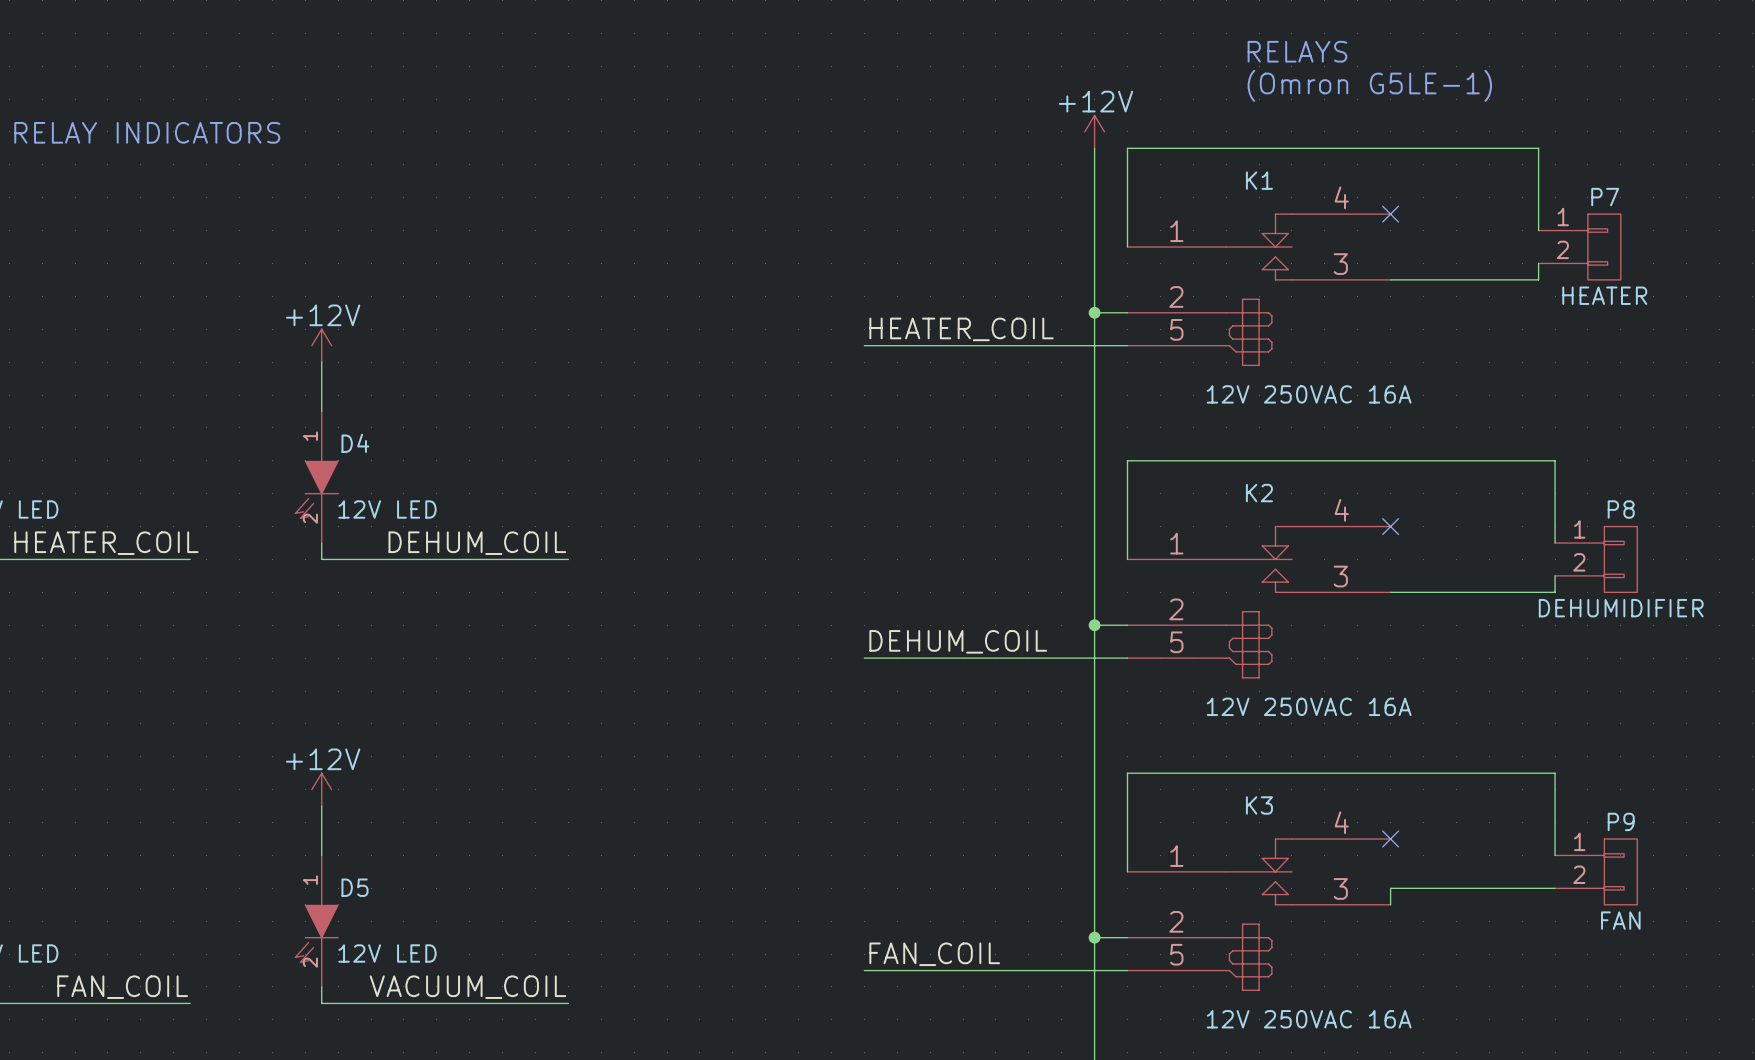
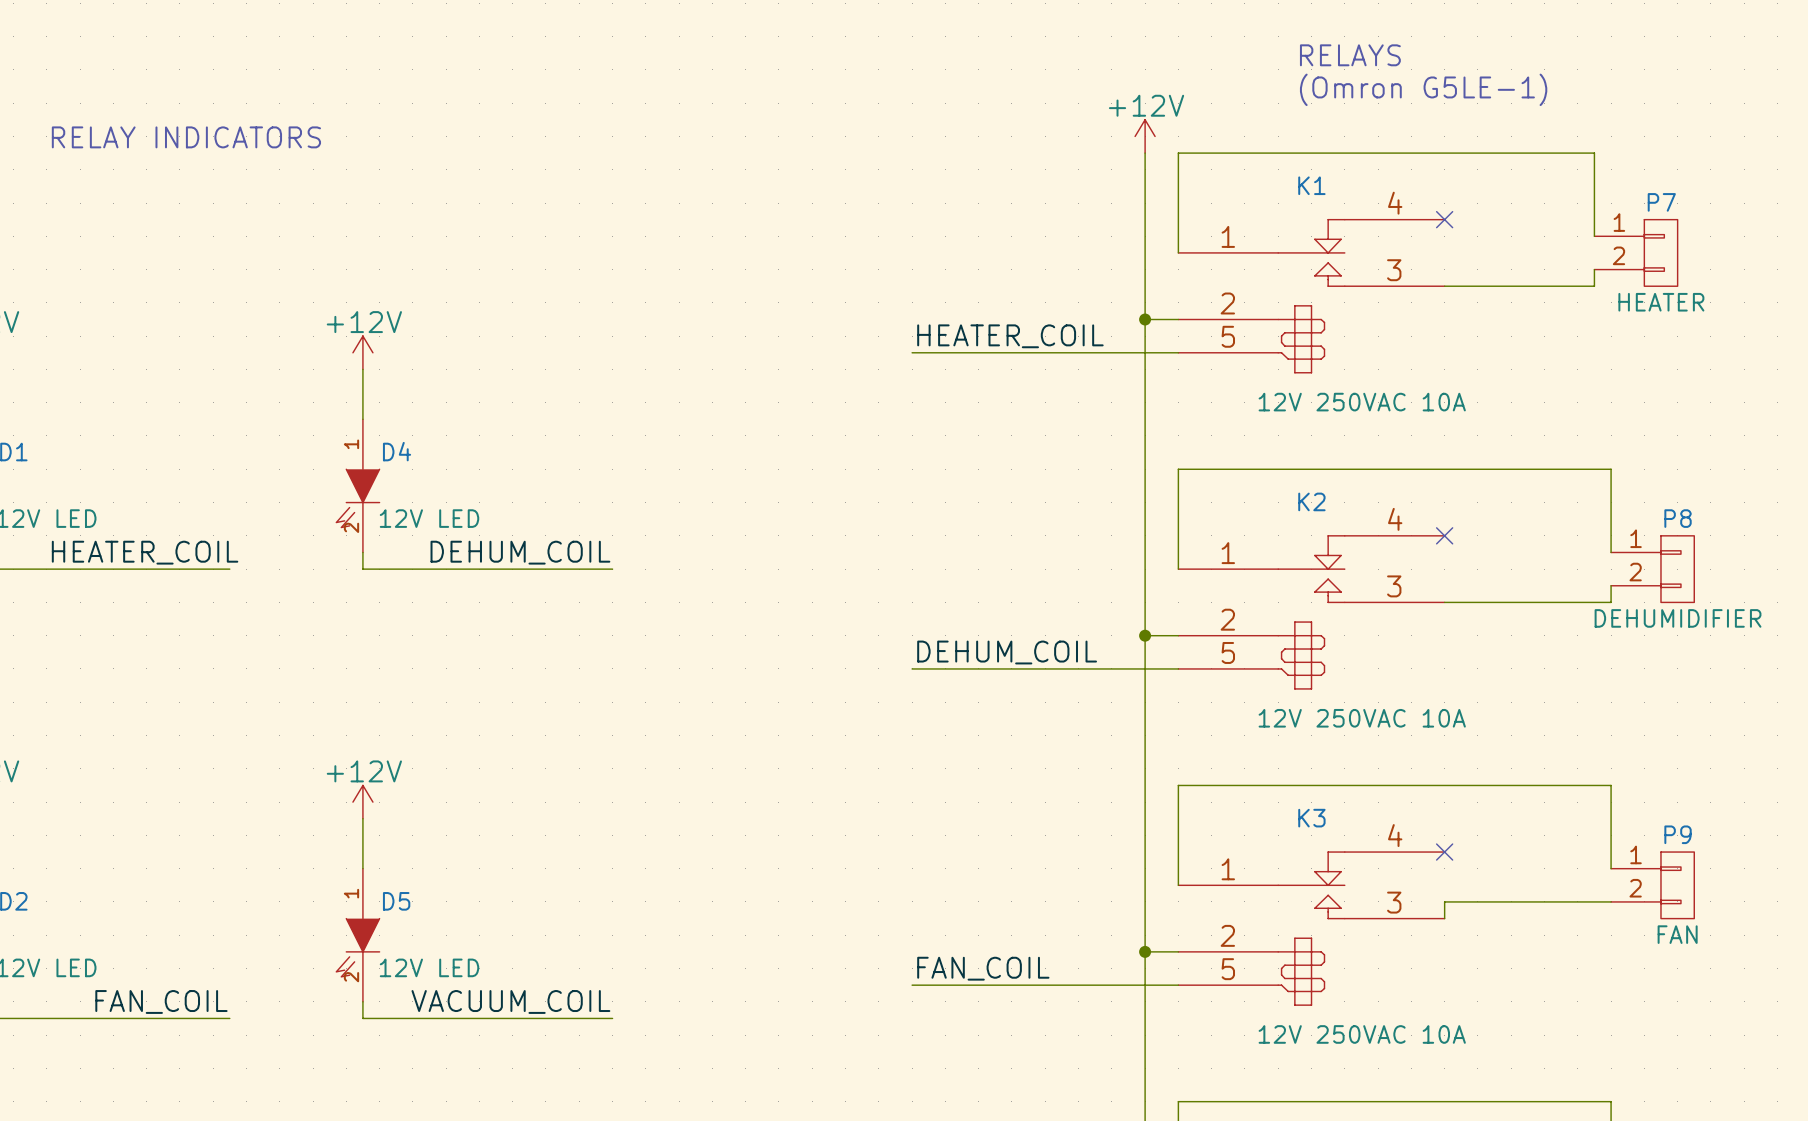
K1 value: 12V 250VAC 16A (1309, 394) -> 12V 250VAC 10A (1362, 402)
K2 value: 12V 250VAC 16A (1309, 706) -> 12V 250VAC 10A (1362, 718)
K3 value: 12V 250VAC 16A (1309, 1019) -> 12V 250VAC 10A (1362, 1034)

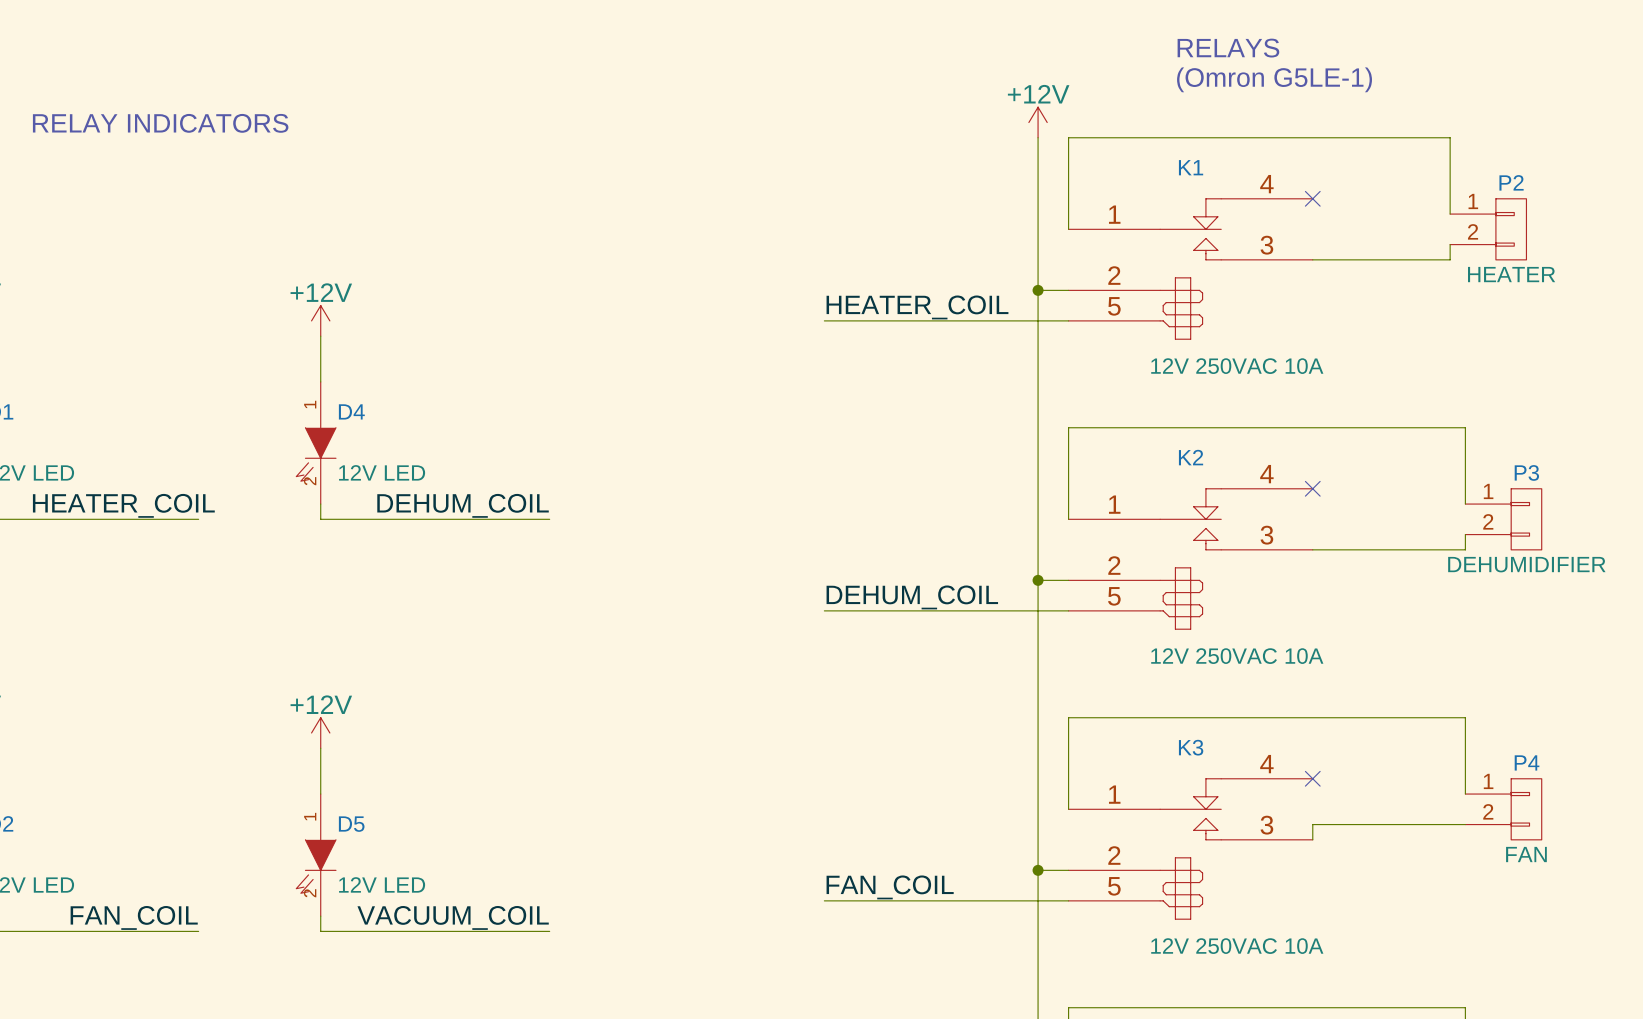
P7 name: P7 (1661, 202) -> P2 (1511, 182)
P8 name: P8 (1678, 518) -> P3 (1526, 472)
P9 name: P9 (1678, 834) -> P4 (1527, 762)

